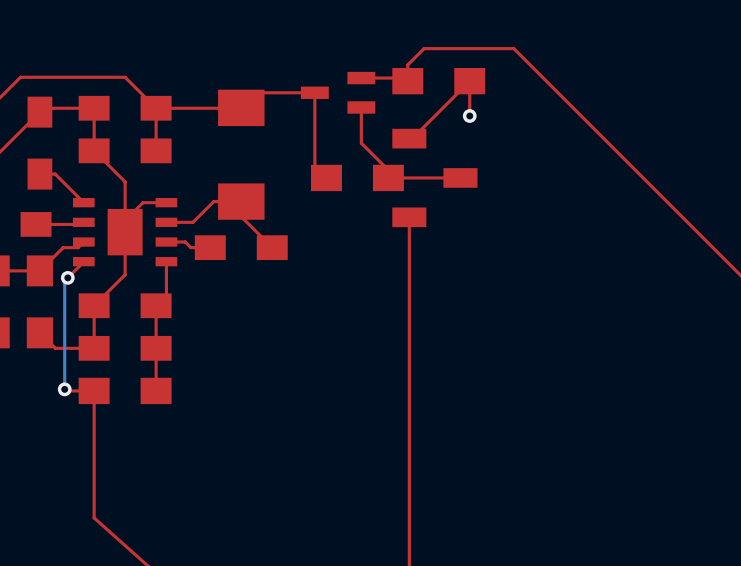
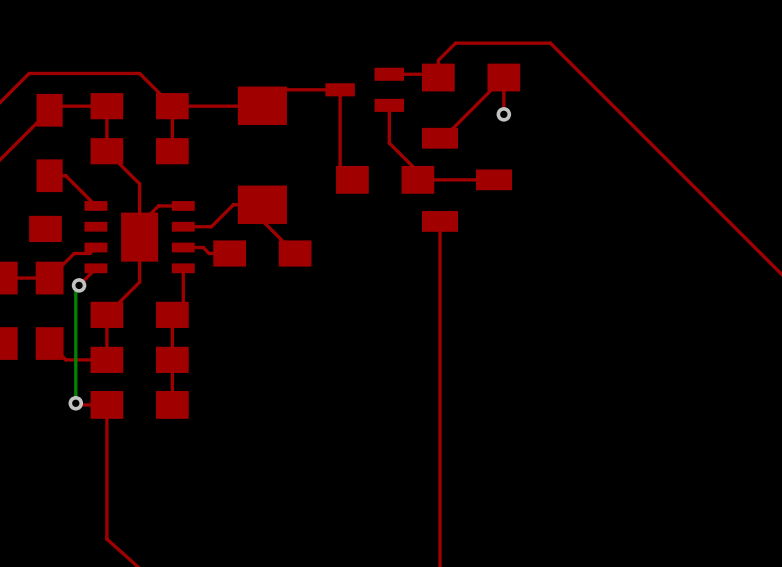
top track: (83, 222) (81, 224) (36, 224) -> none

